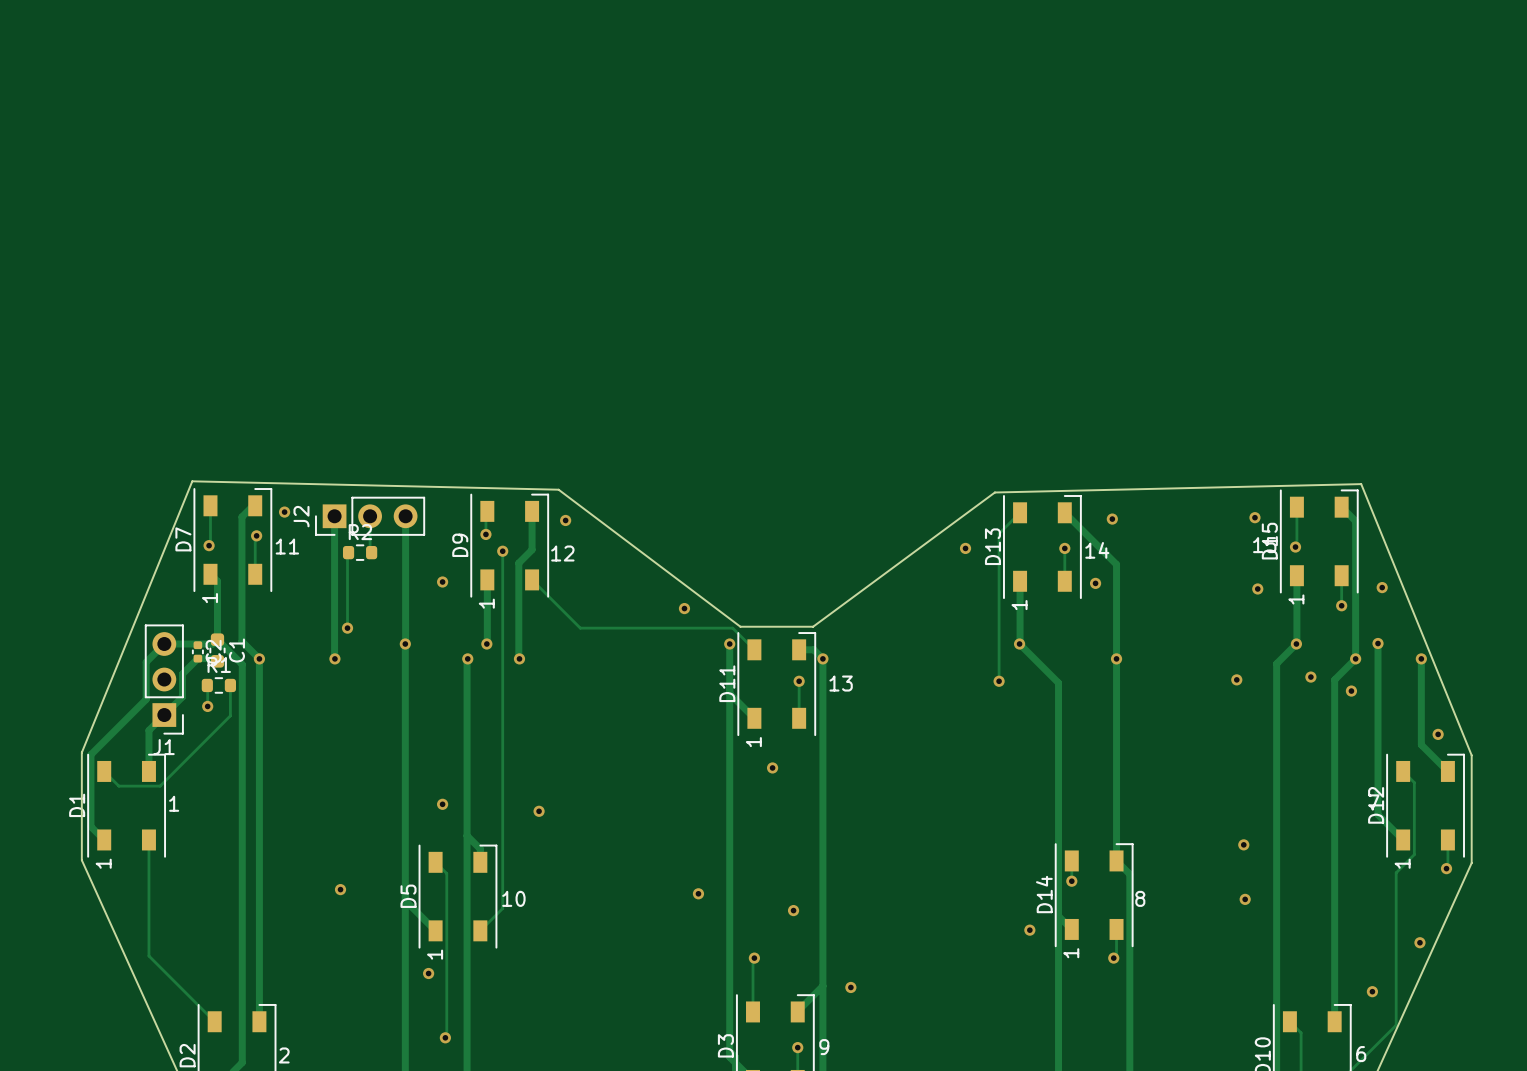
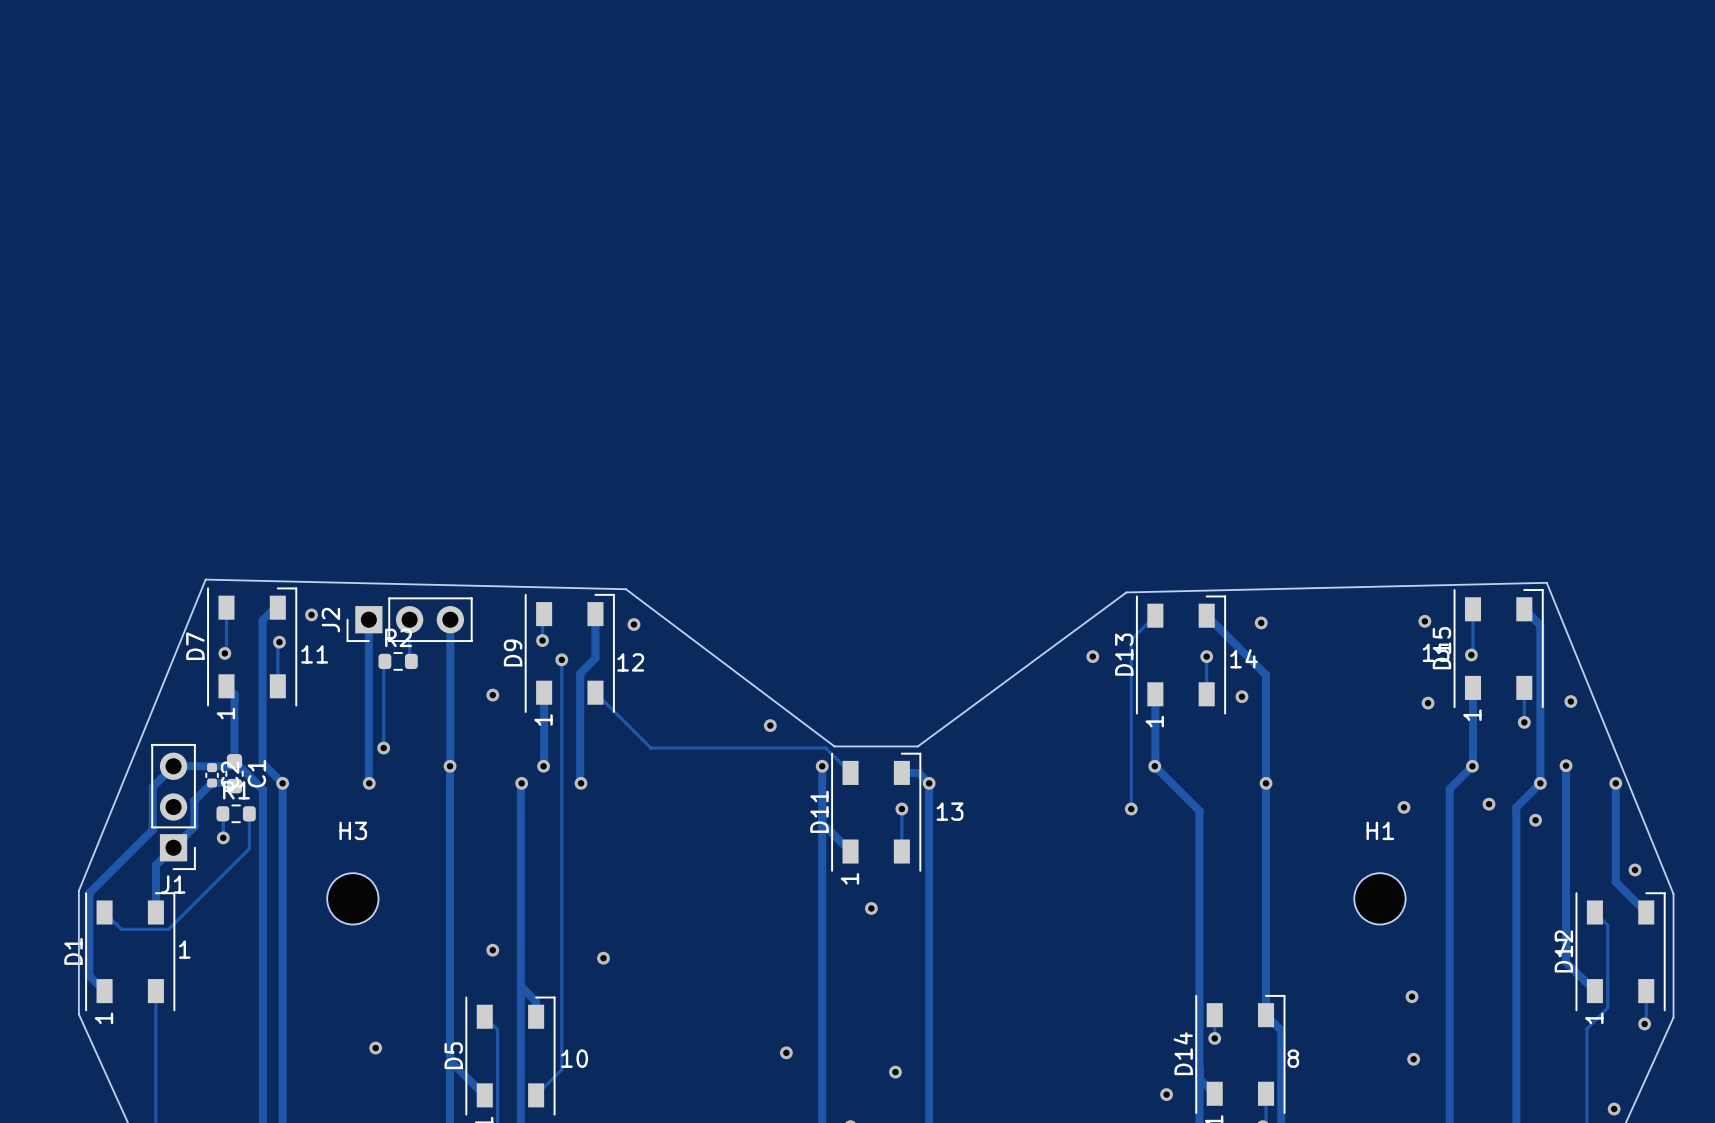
H3: none -> (352, 898)
H1: none -> (1379, 898)

